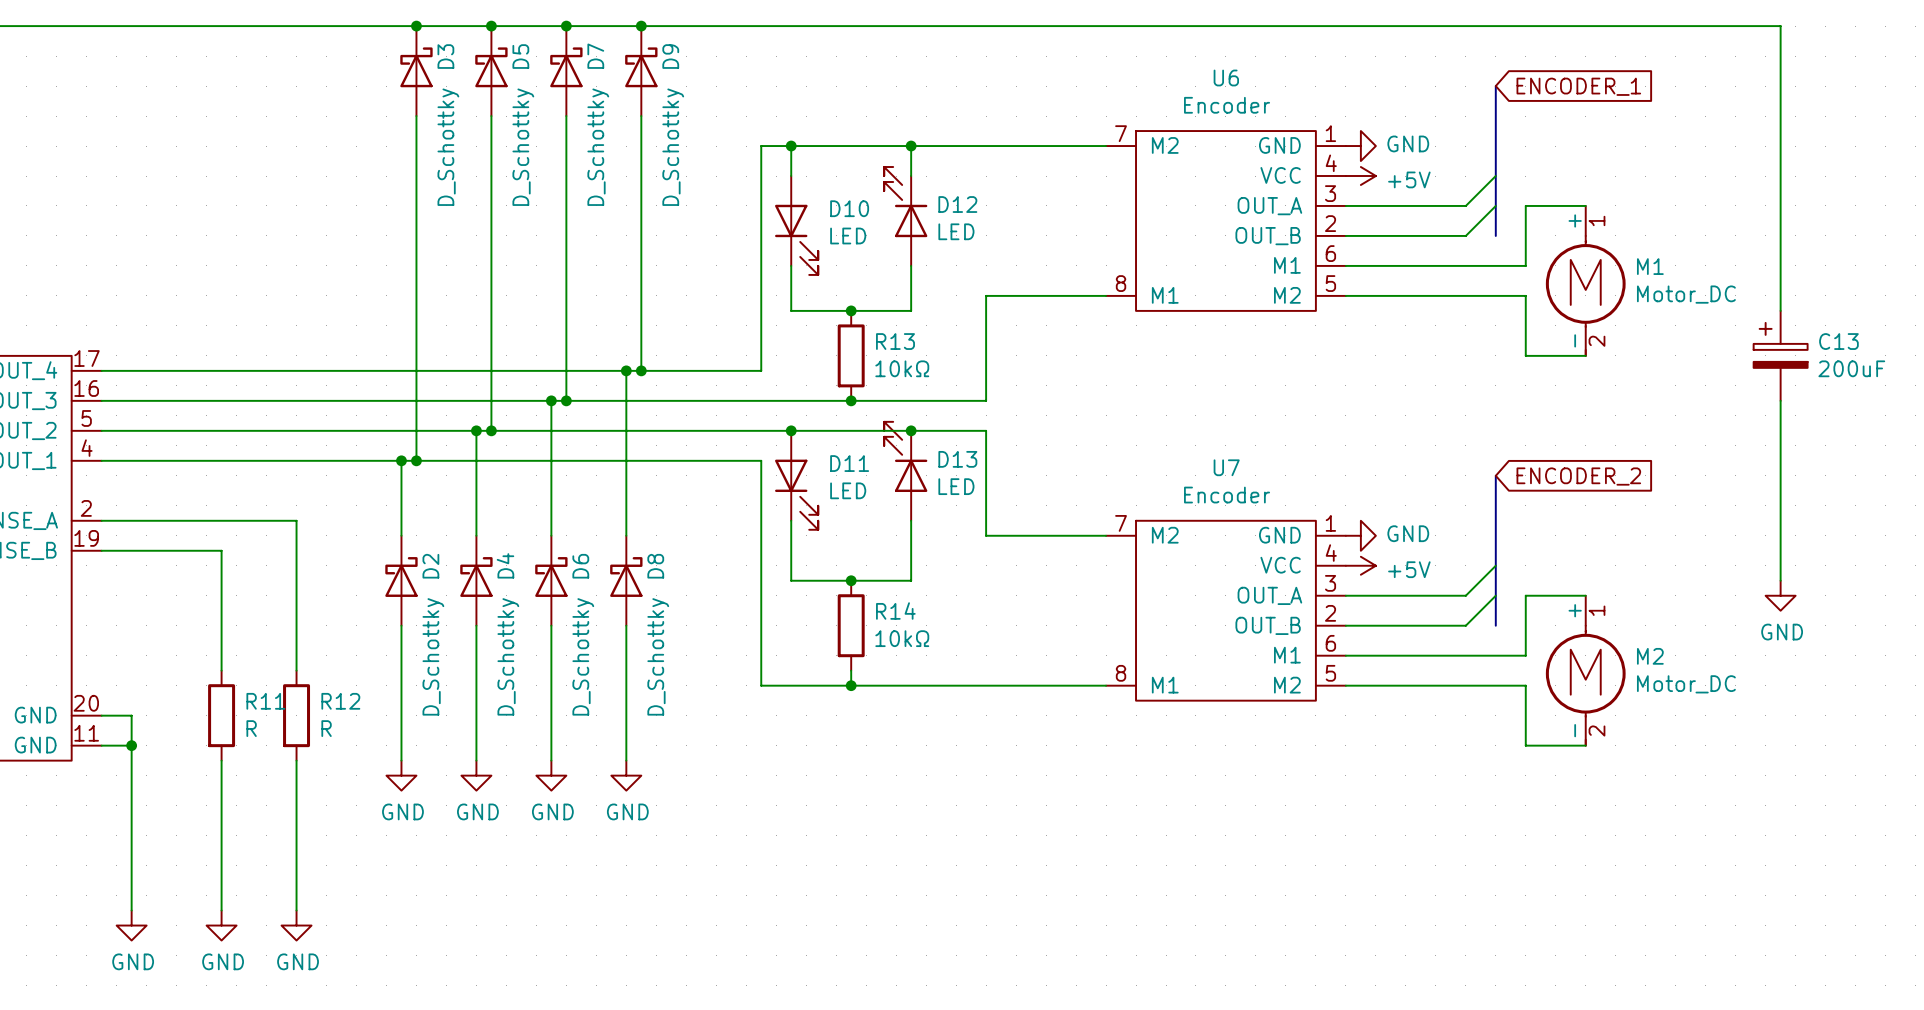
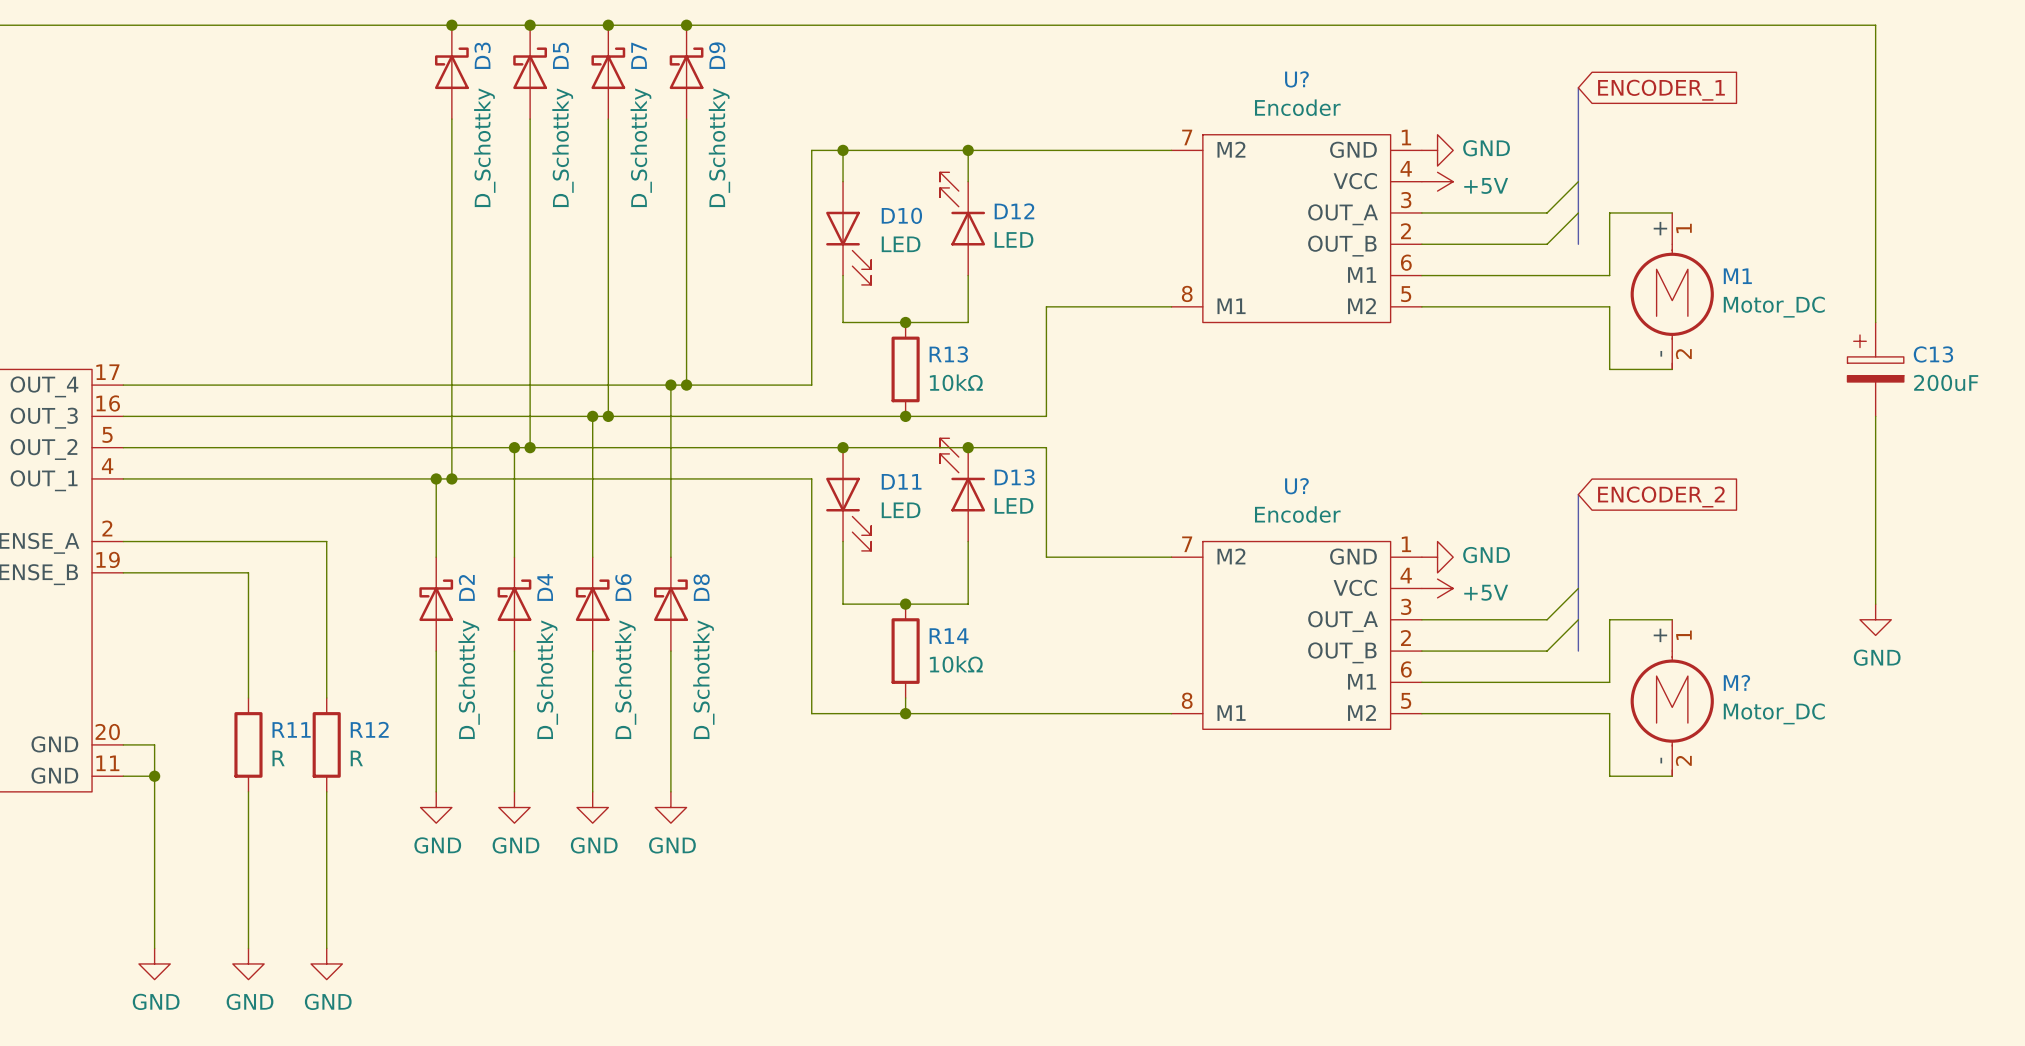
U6 name: U6 (1226, 78) -> U? (1296, 79)
U7 name: U7 (1226, 467) -> U? (1296, 486)
M2 name: M2 (1650, 656) -> M? (1736, 682)

